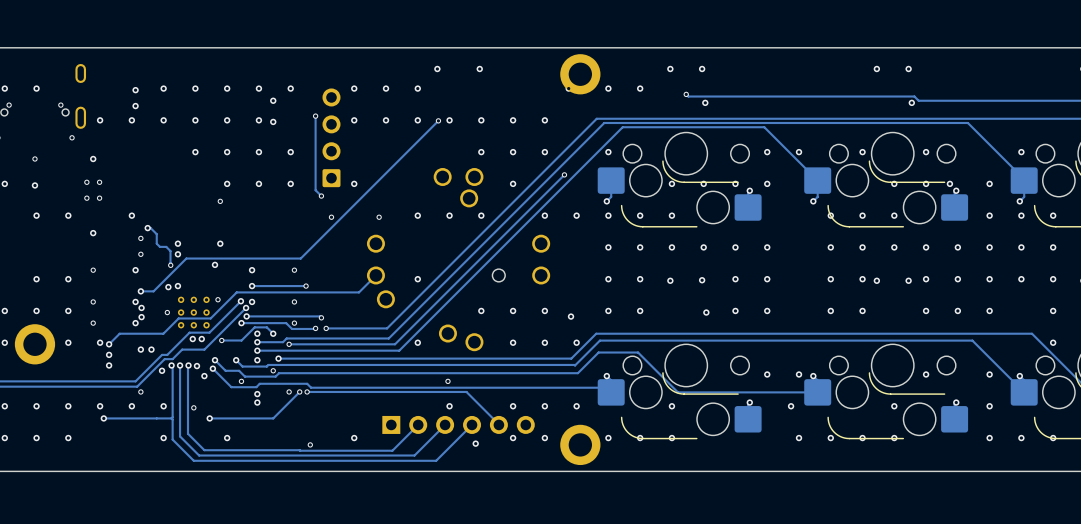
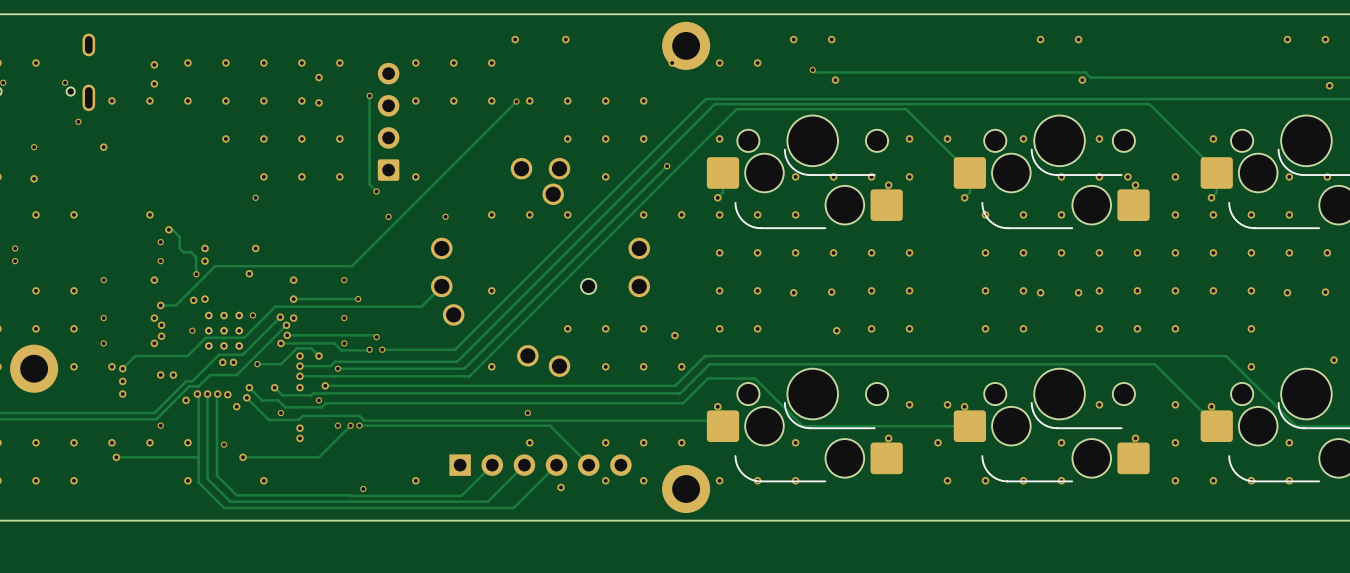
via: (86, 182) -> none
via: (99, 182) -> none
via: (86, 198) -> none
via: (99, 198) -> none
via: (93, 233) -> none
via: none -> (15, 248)
via: none -> (15, 261)

